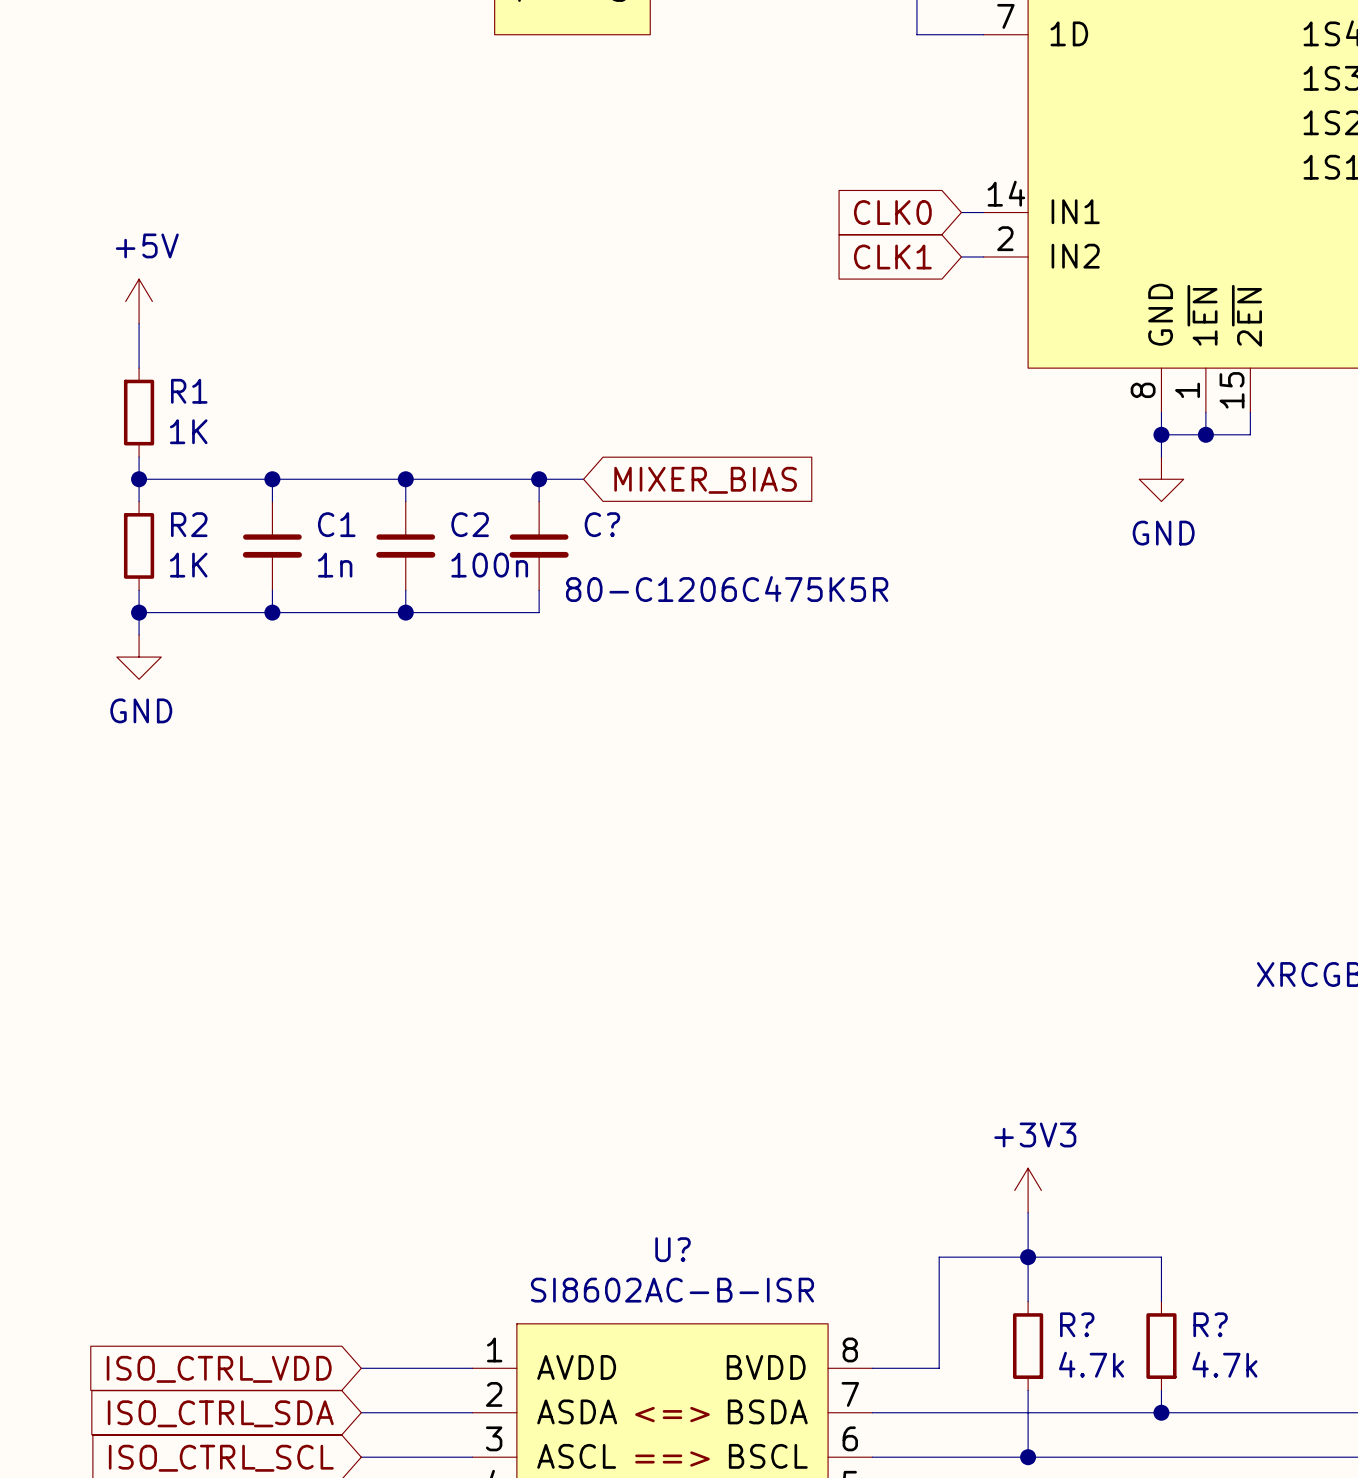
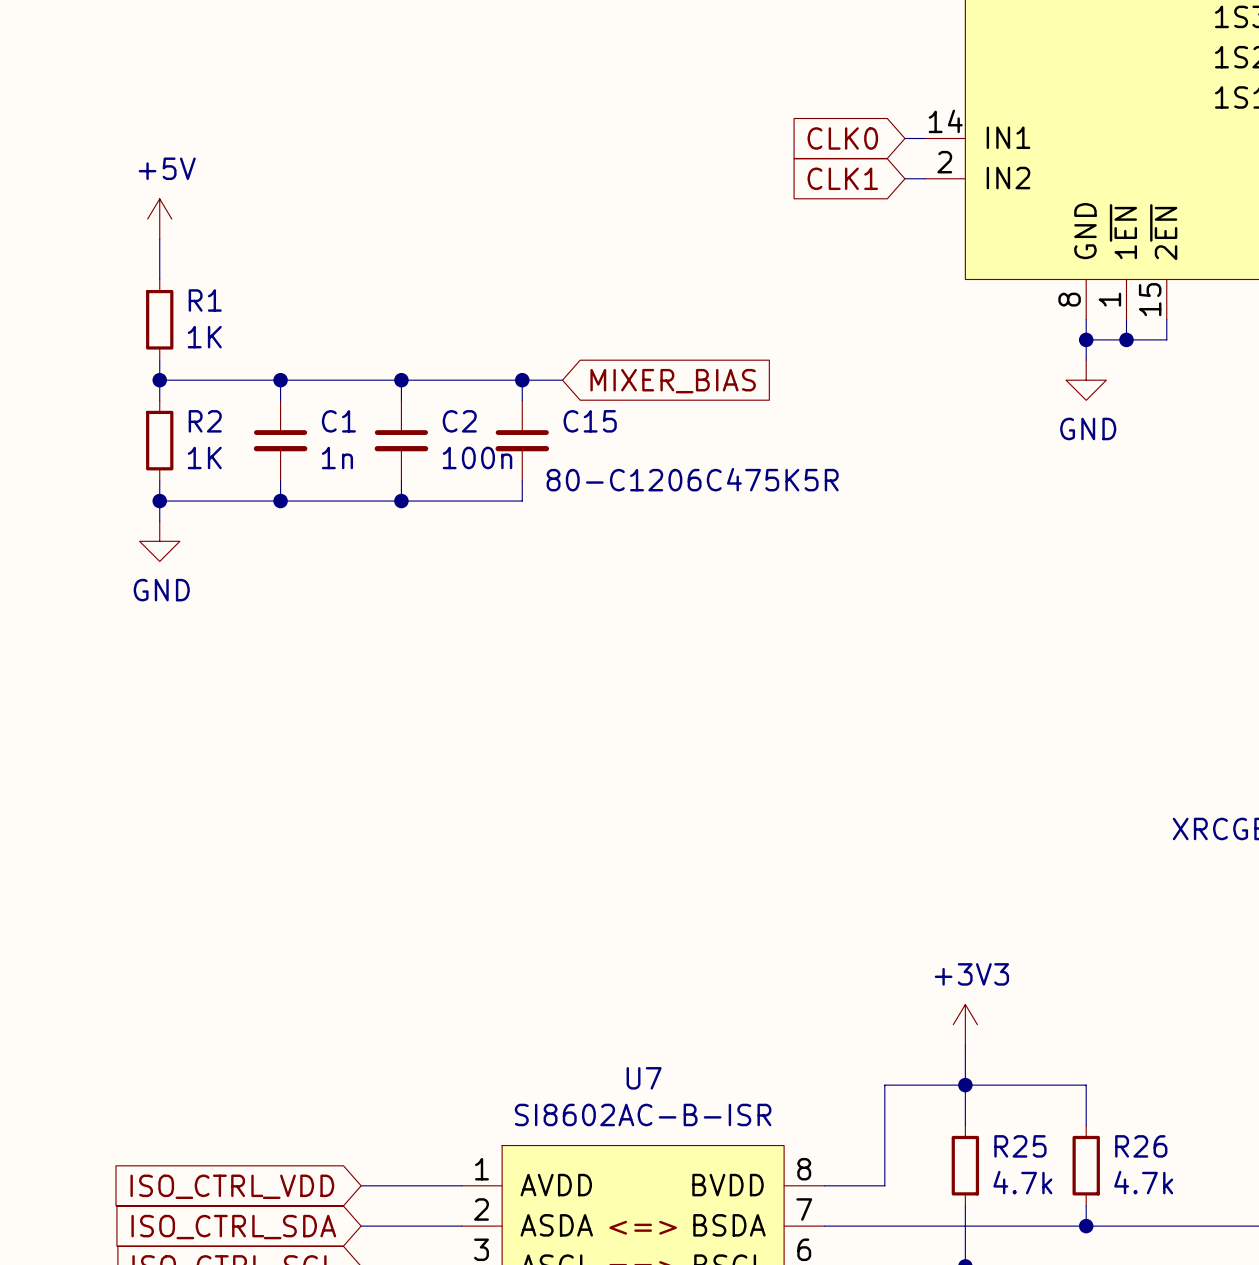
C? name: C? (602, 524) -> C15 (590, 421)
U? name: U? (673, 1249) -> U7 (644, 1078)
R? name: R? (1077, 1324) -> R25 (1020, 1146)
R? name: R? (1210, 1324) -> R26 (1141, 1146)

